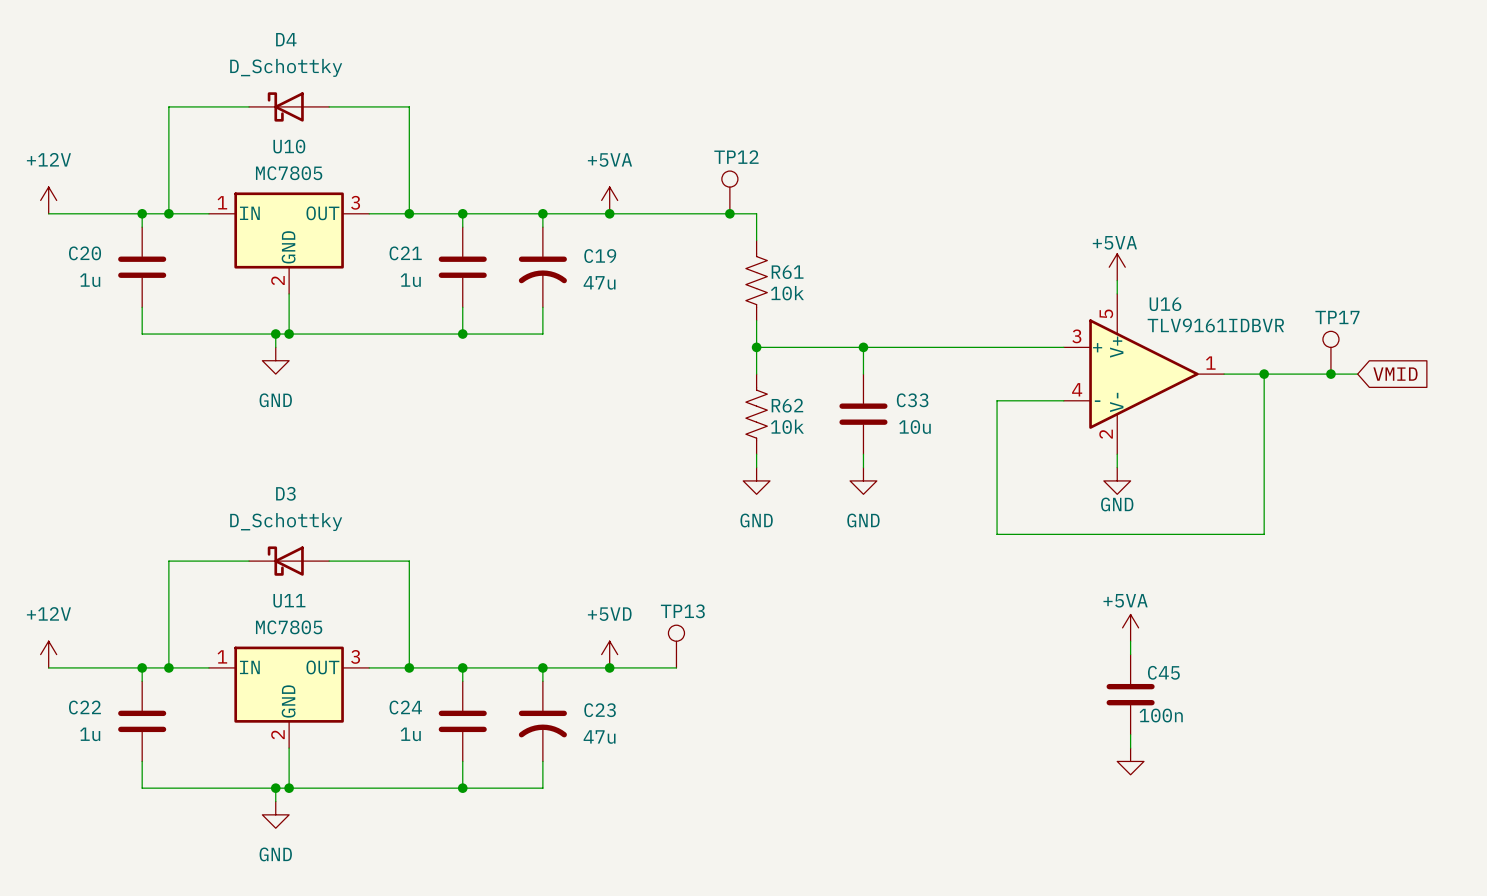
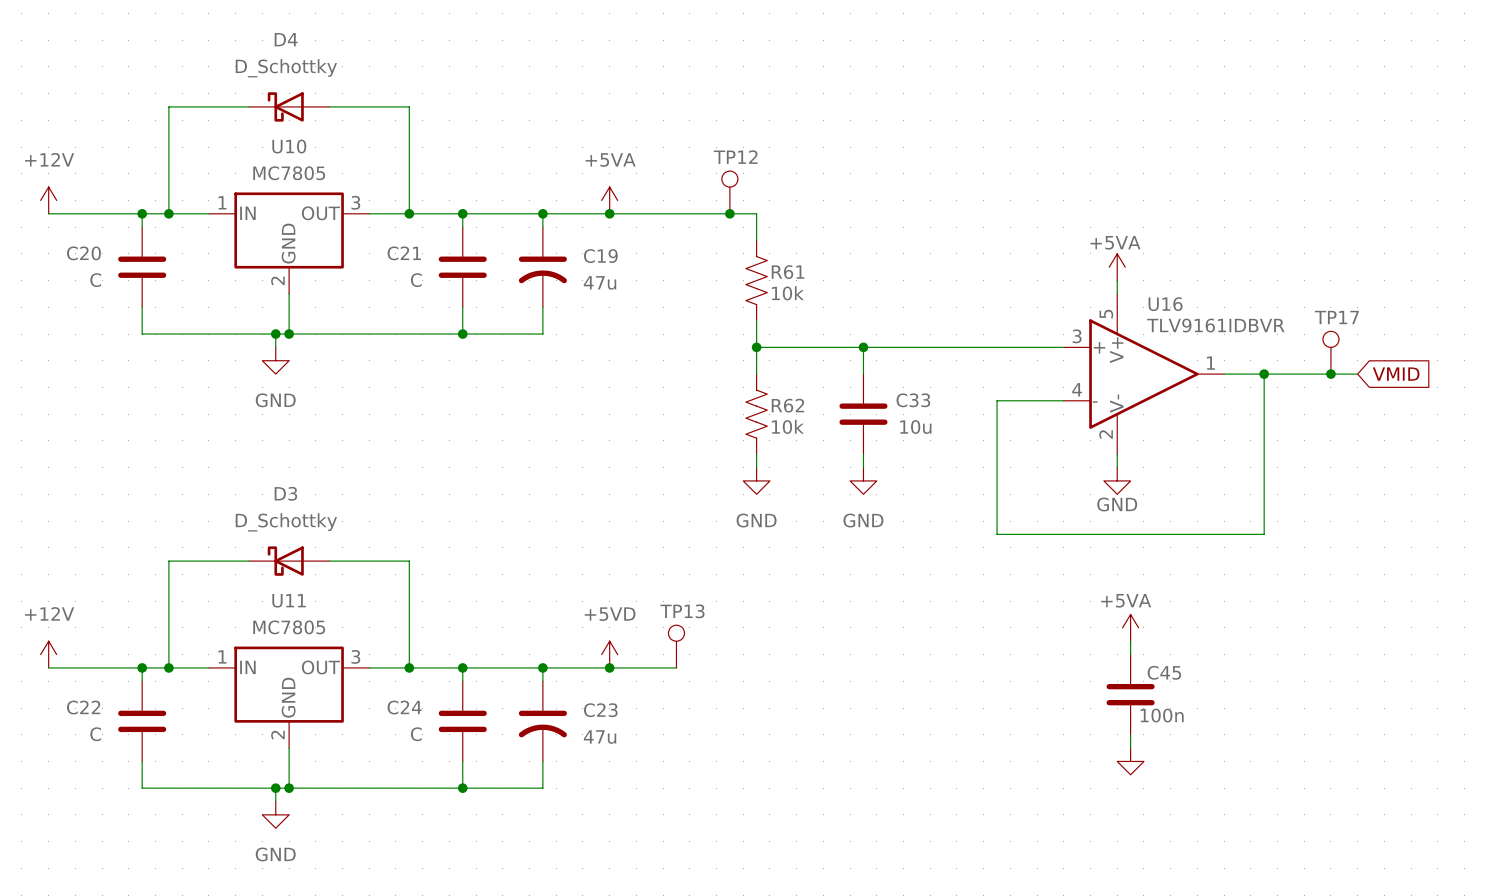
C20 value: 1u (90, 280) -> C (95, 280)
C21 value: 1u (410, 280) -> C (416, 280)
C22 value: 1u (90, 734) -> C (95, 734)
C24 value: 1u (410, 734) -> C (416, 734)

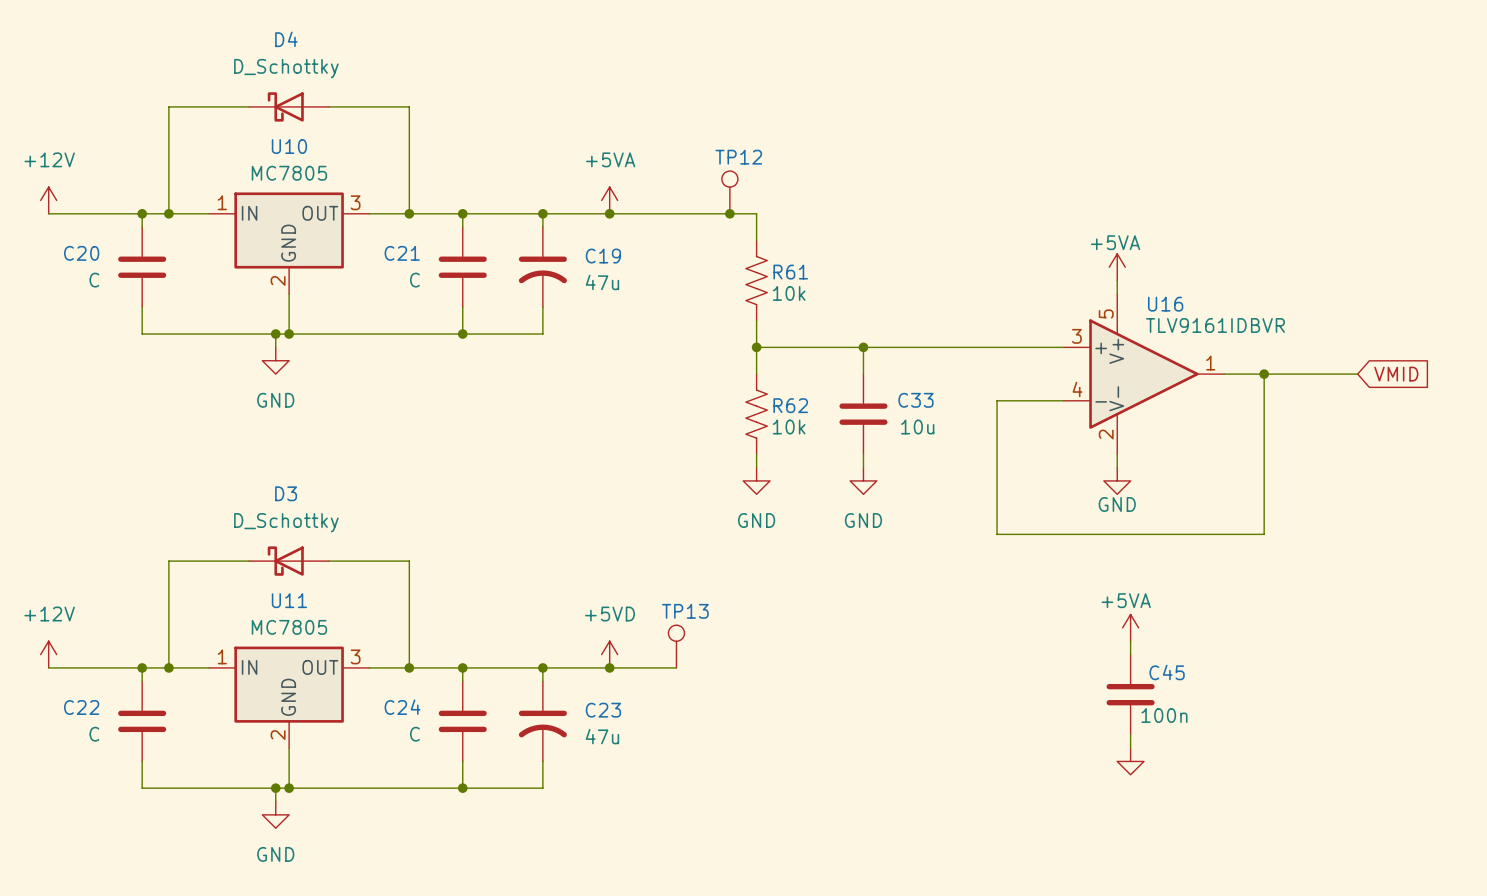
TP17: (1330, 352) -> none
junction: (1330, 374) -> none

